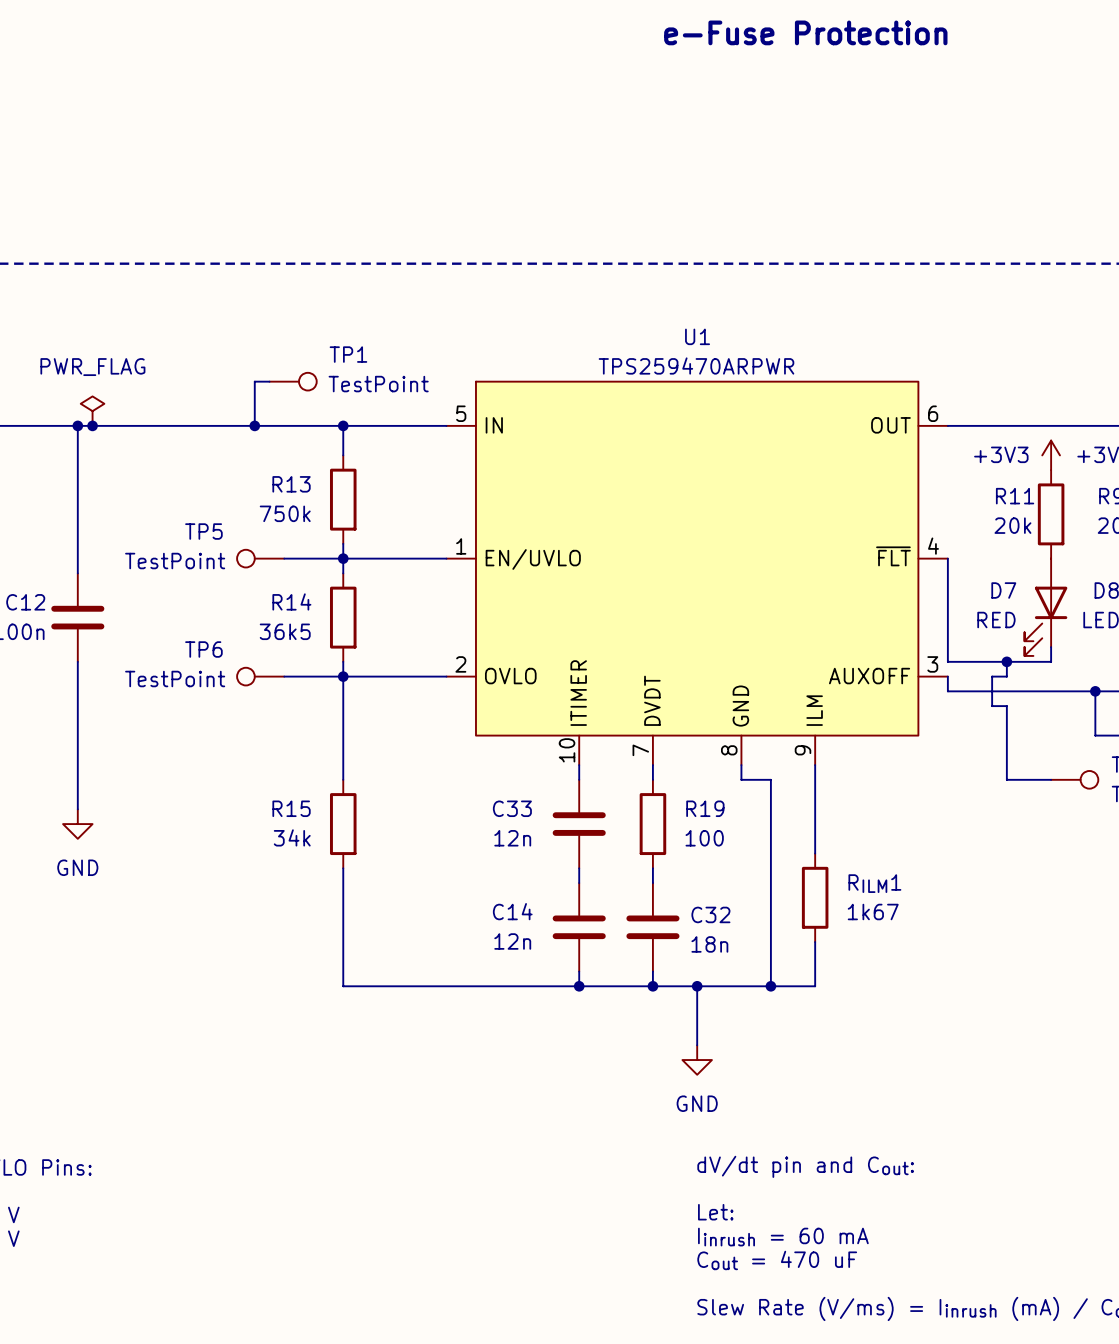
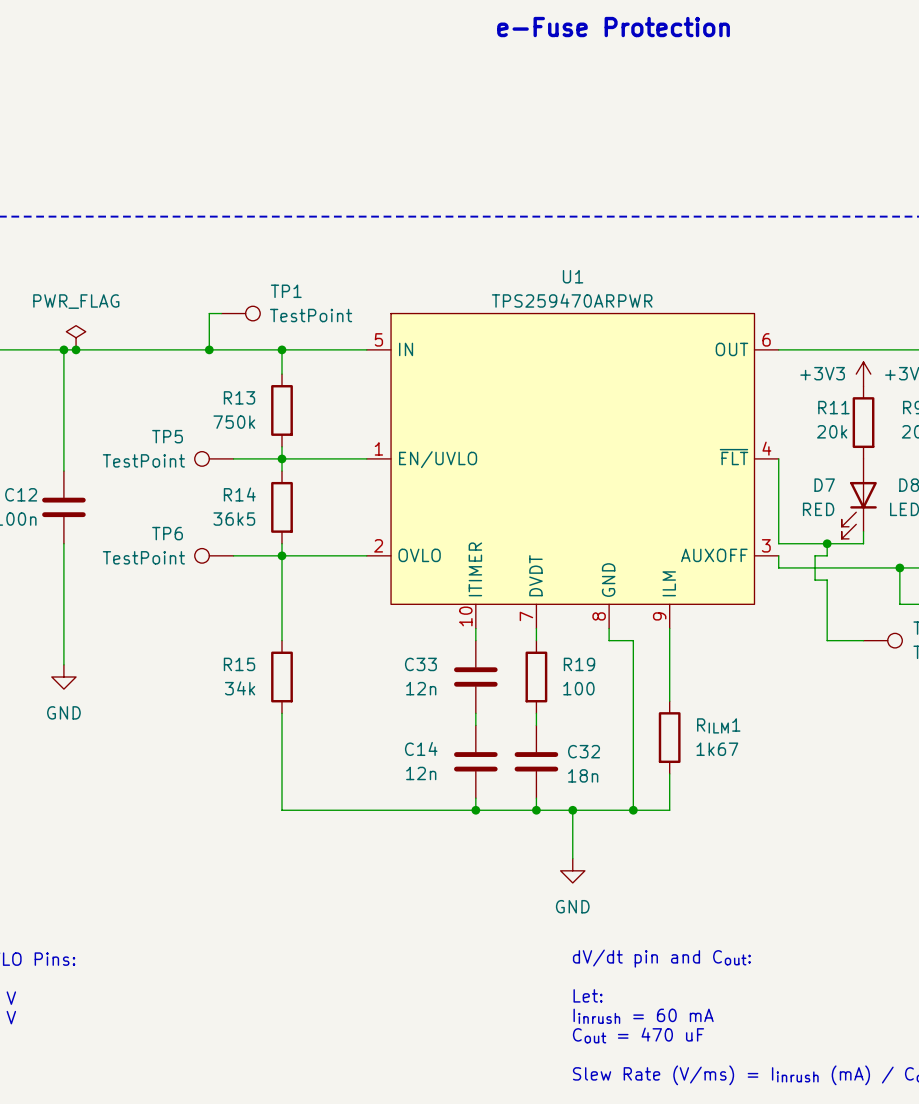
text position: e-Fuse Protection (805, 32) -> e-Fuse Protection (613, 27)

